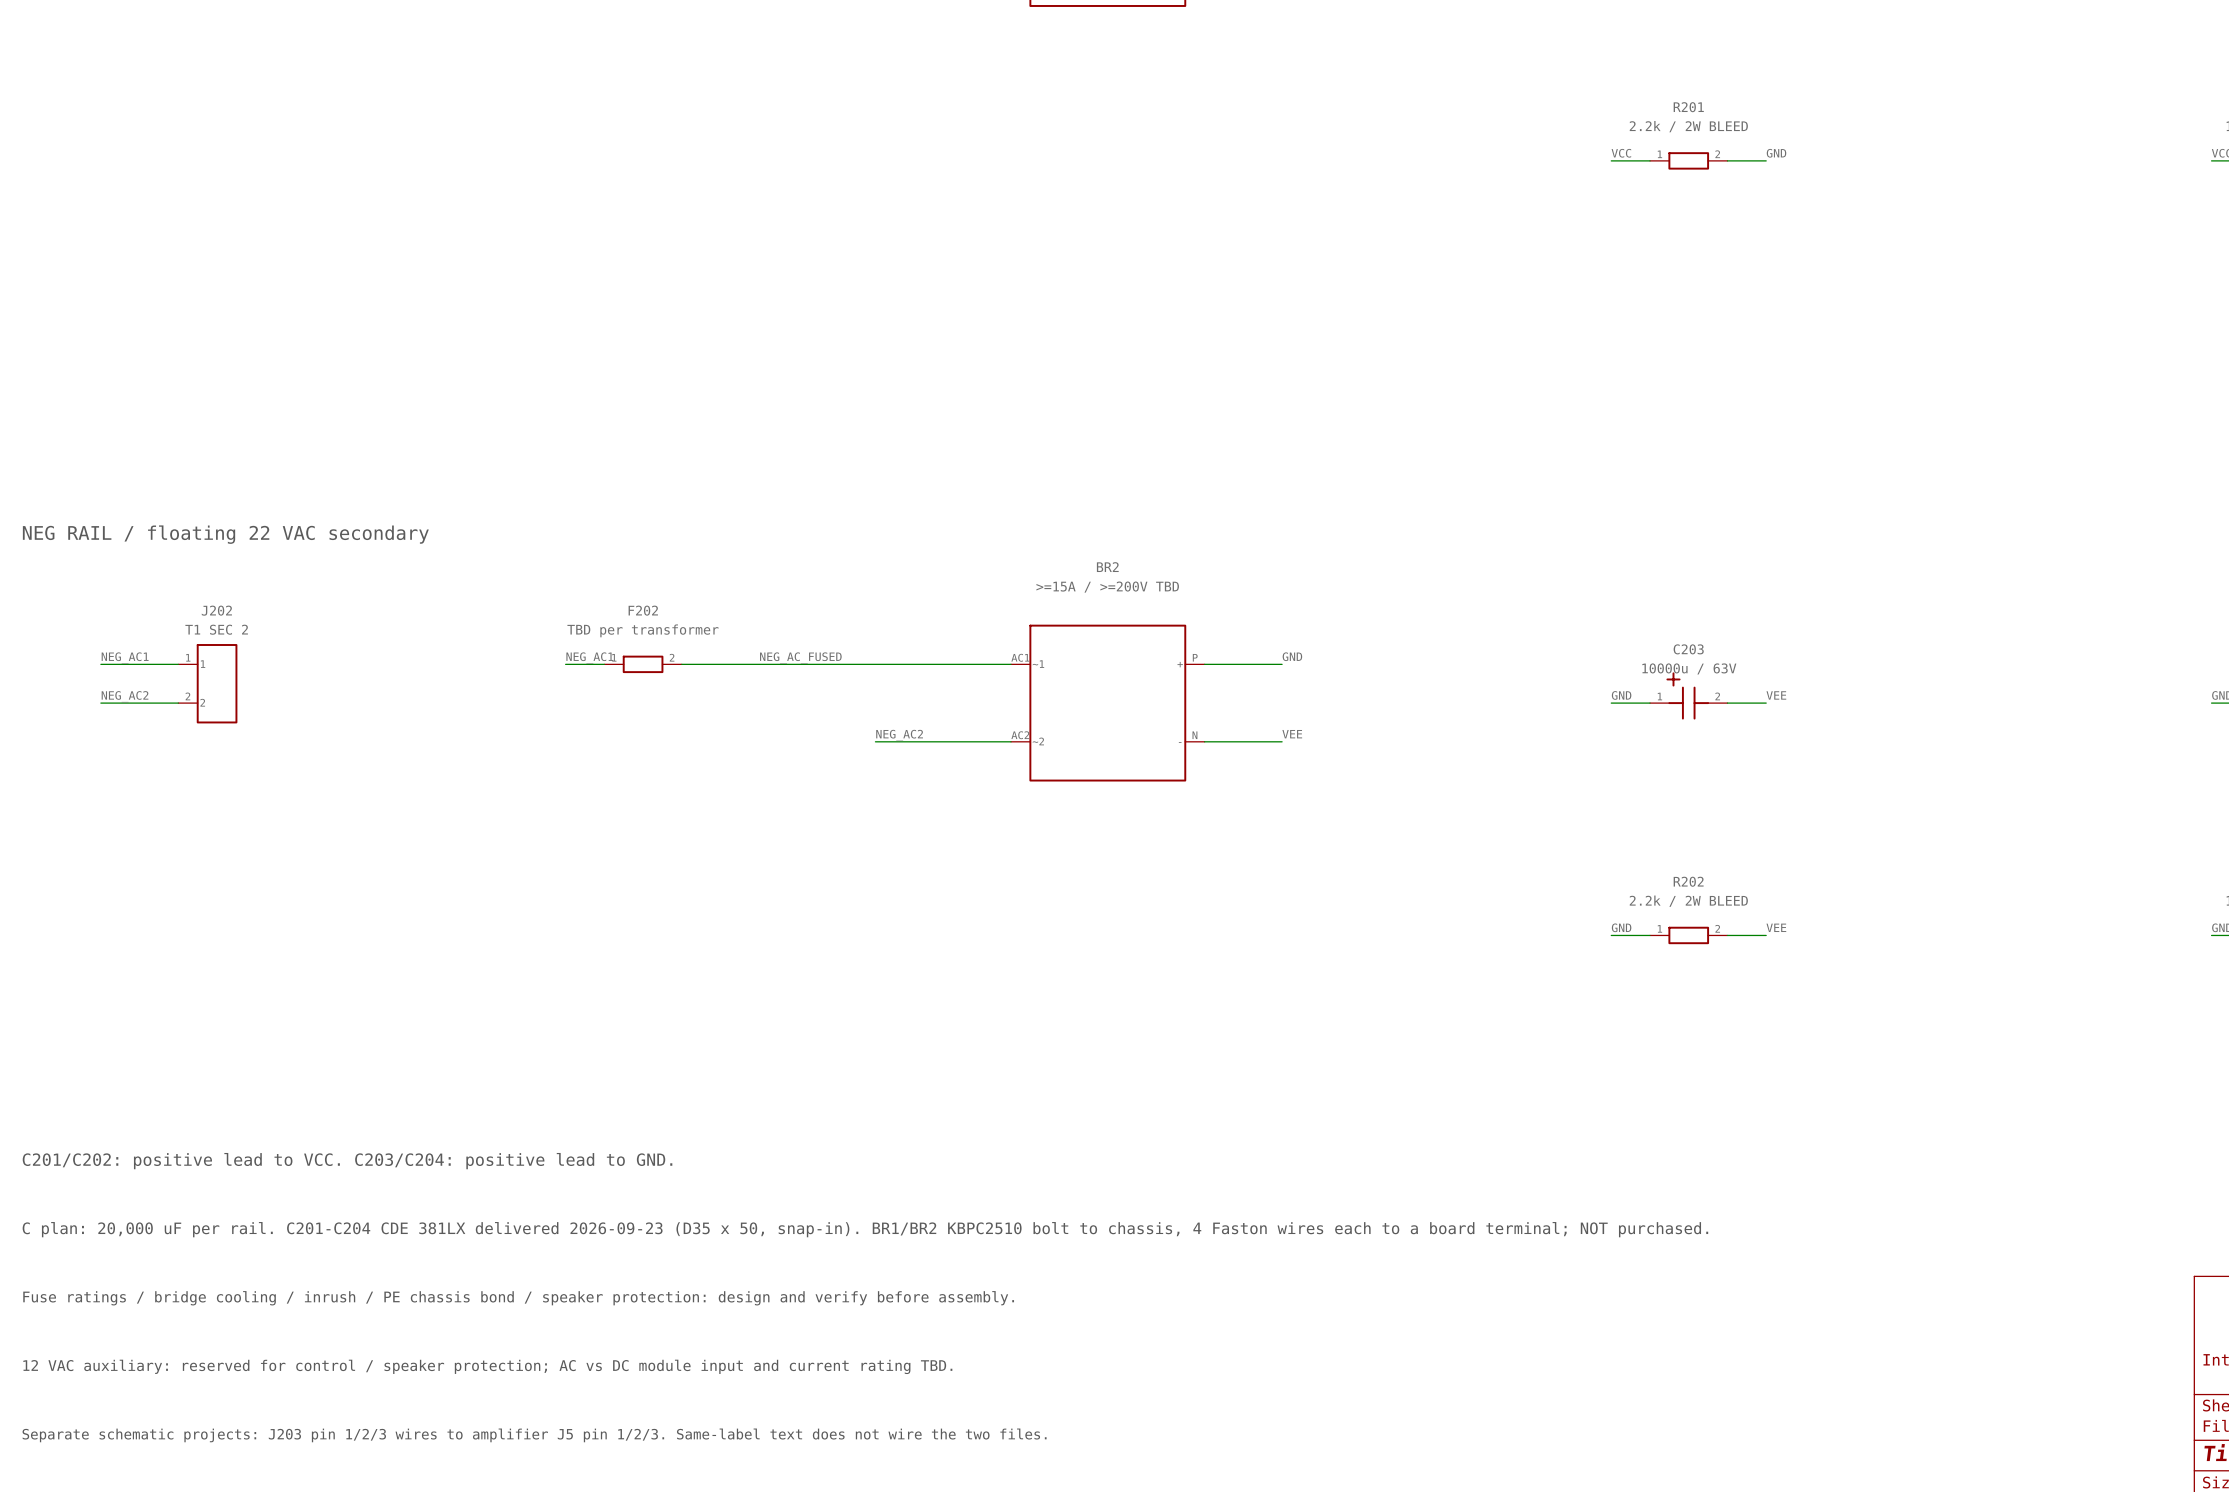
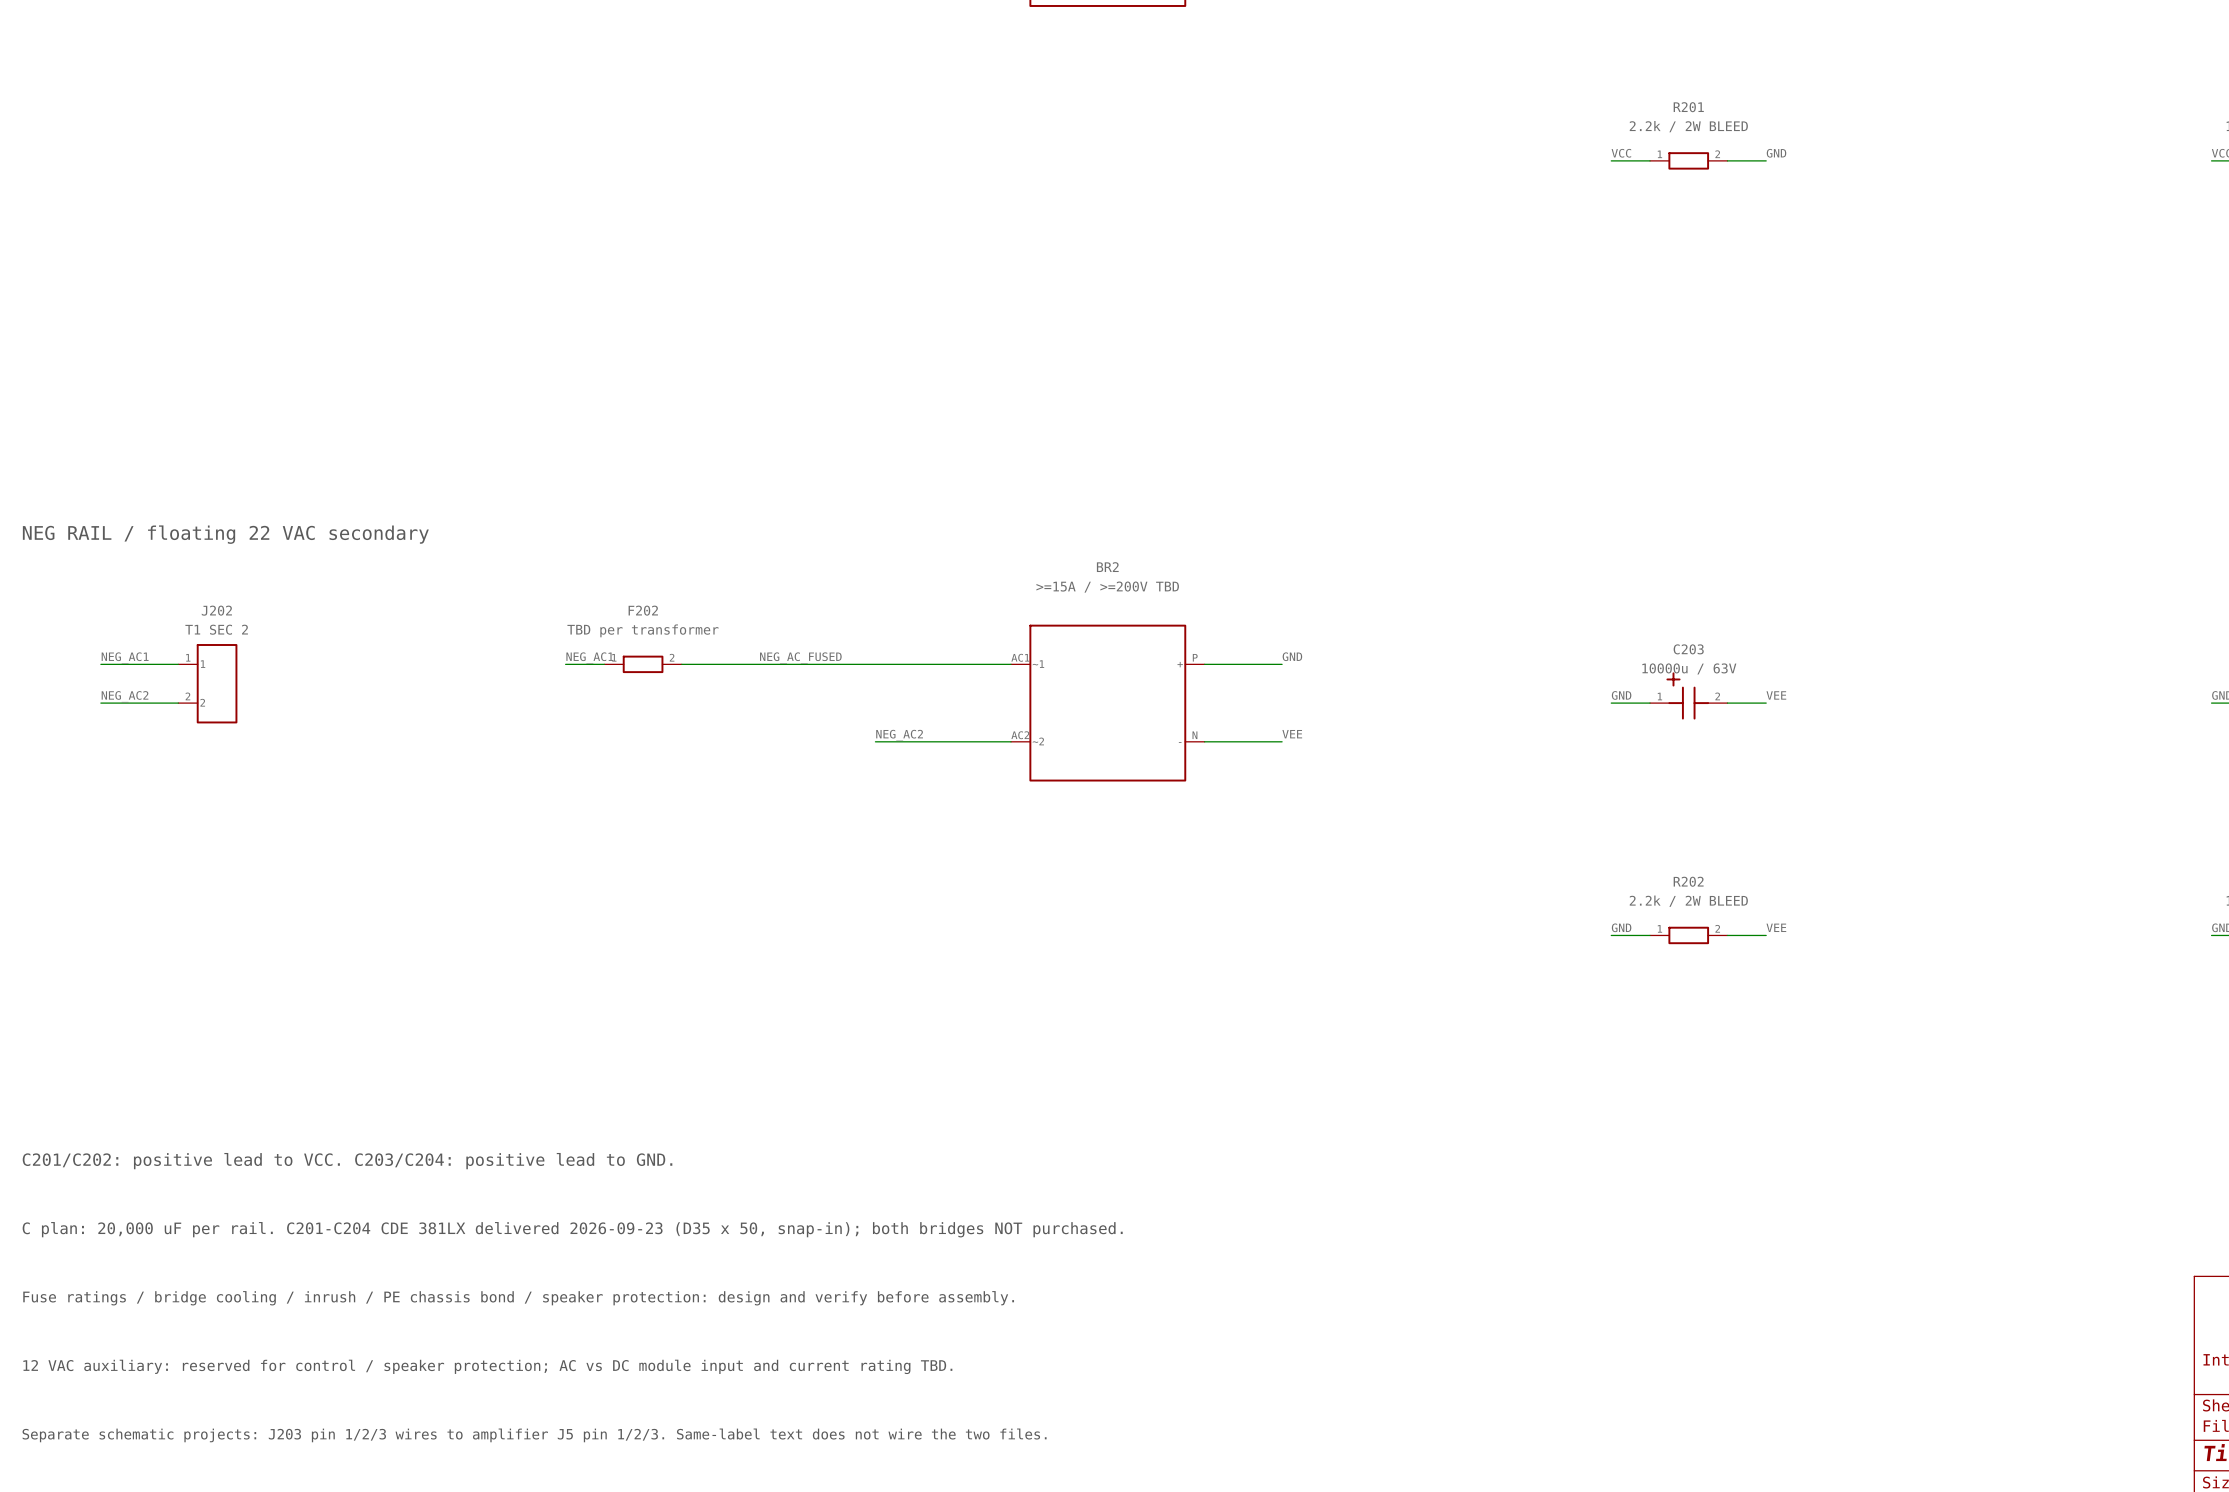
text: C plan: 20,000 uF per rail. C201-C204 CDE 381LX delivered 2026-09-23 (D35 x 50, snap-in). BR1/BR2 KBPC2510 bolt to chassis, 4 Faston wires each to a board terminal; NOT purchased. (865, 1229) -> C plan: 20,000 uF per rail. C201-C204 CDE 381LX delivered 2026-09-23 (D35 x 50, snap-in); both bridges NOT purchased. (572, 1229)

